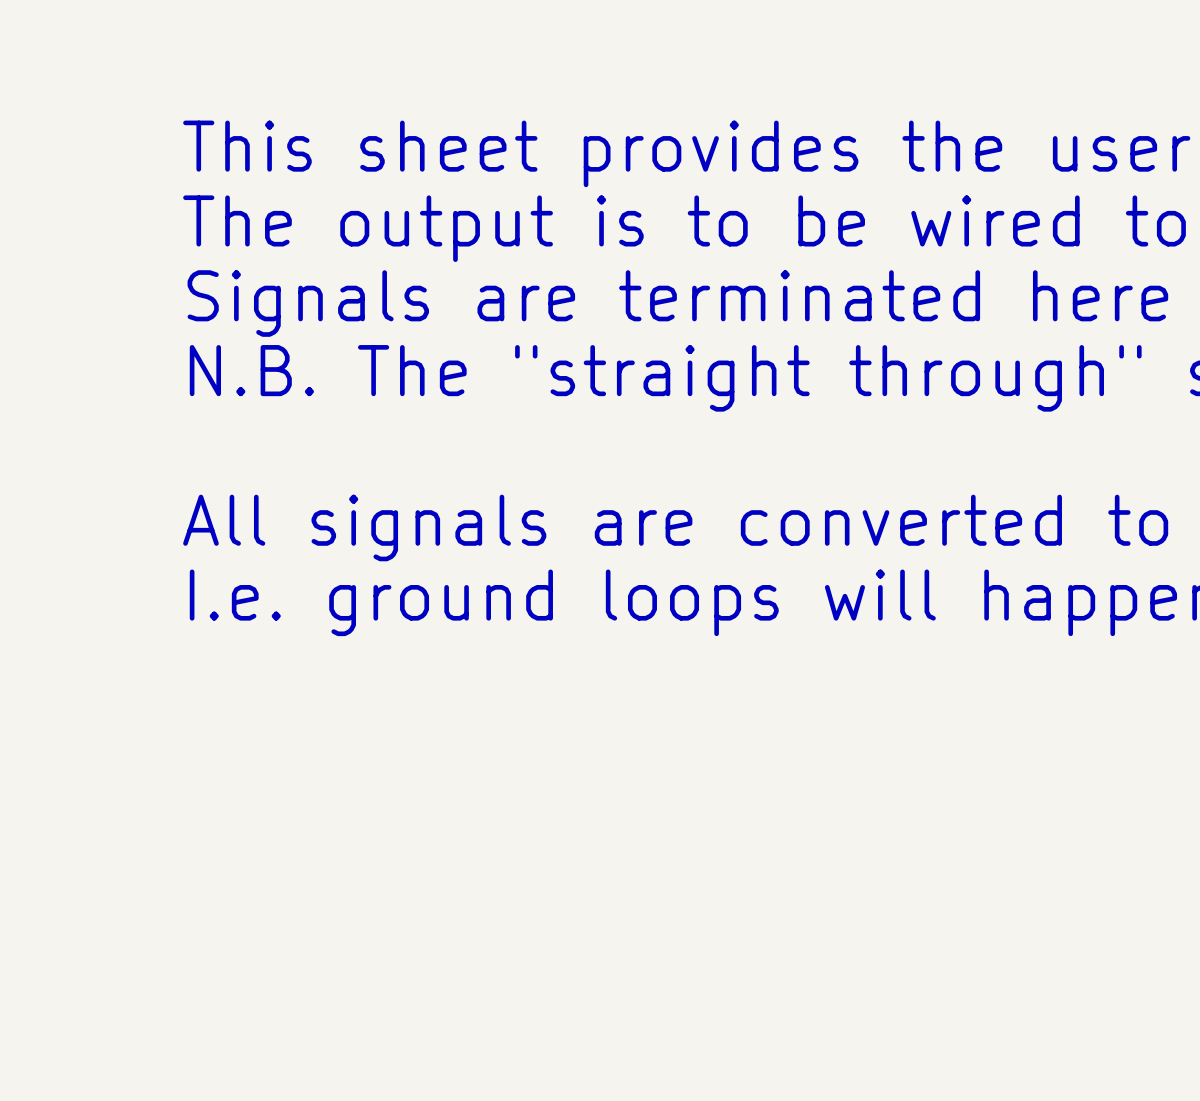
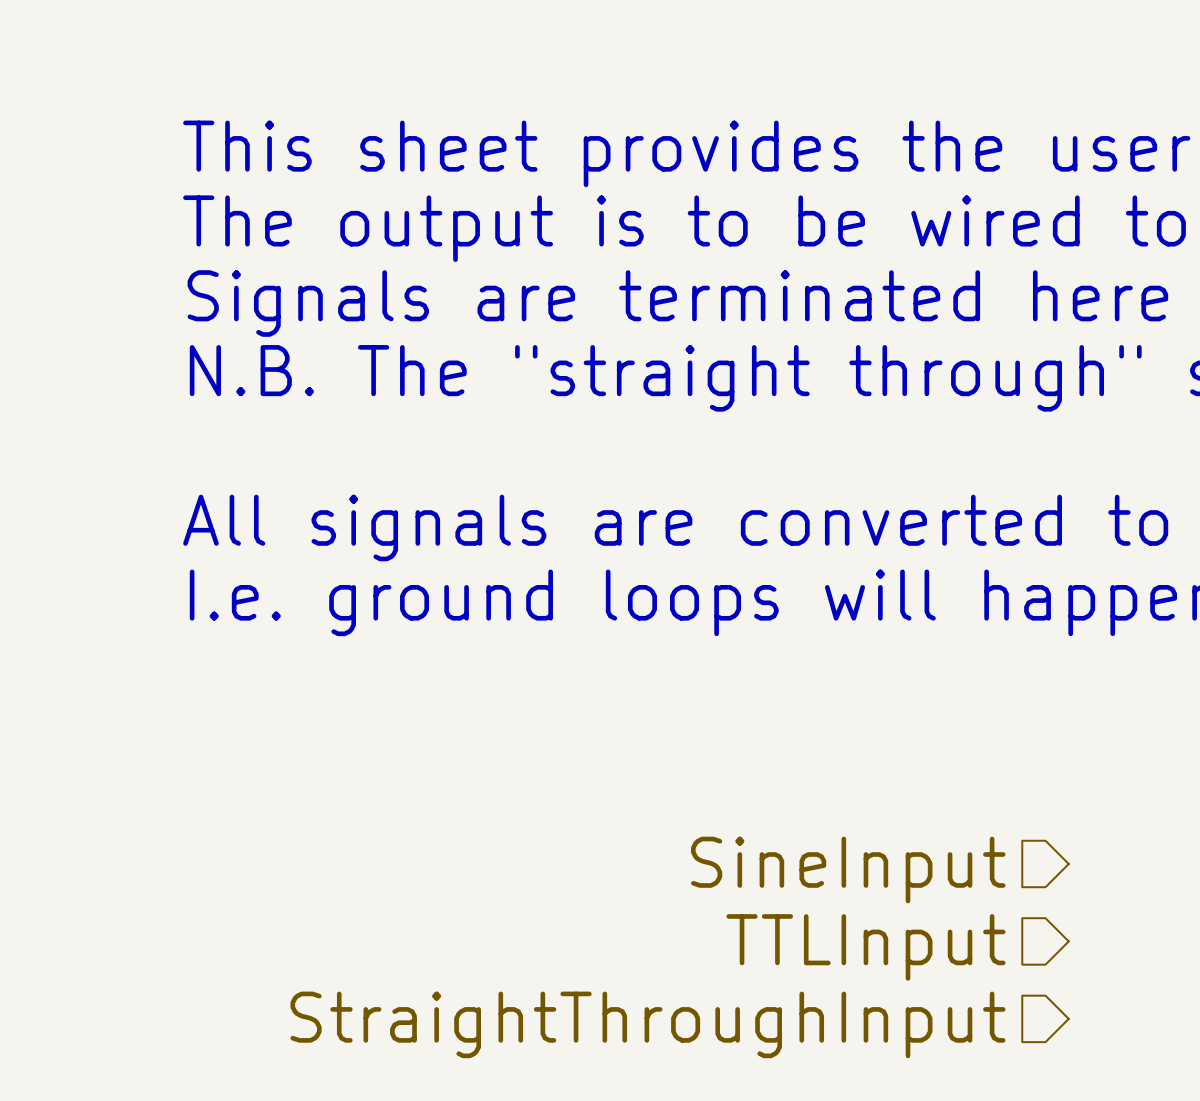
hierarchical label: none -> SineInput (848, 869)
hierarchical label: none -> TTLInput (865, 947)
hierarchical label: none -> StraightThroughInput (647, 1024)

